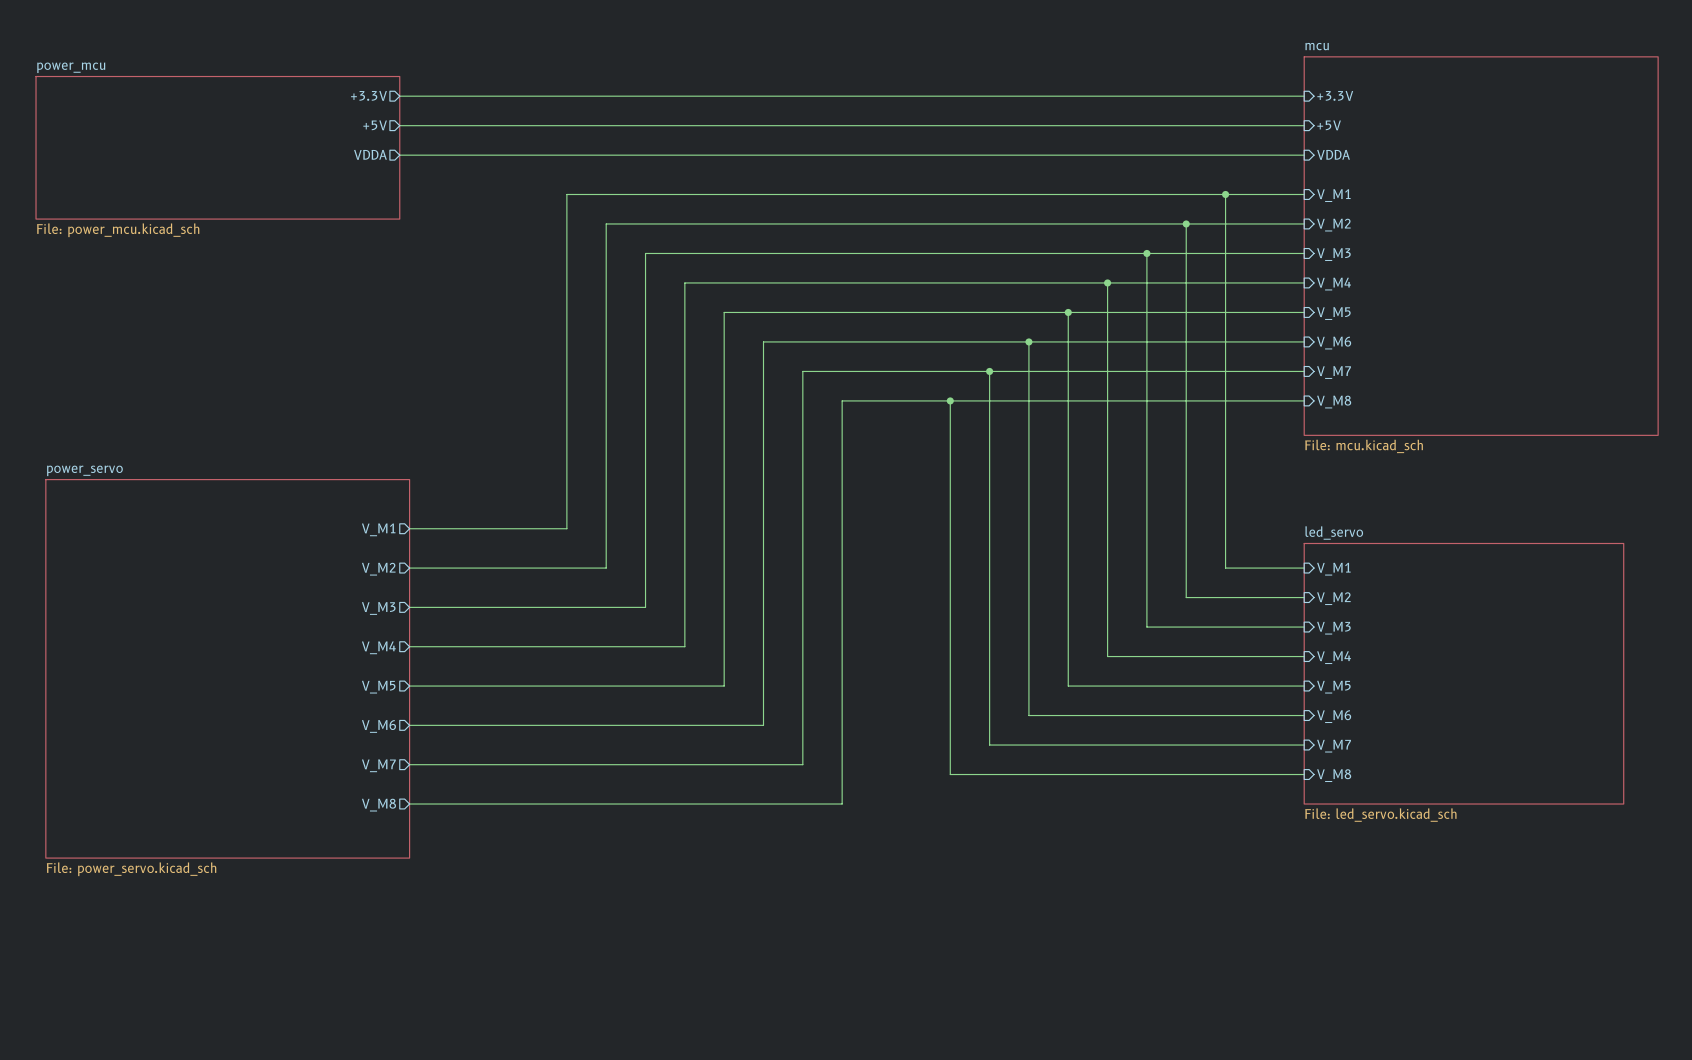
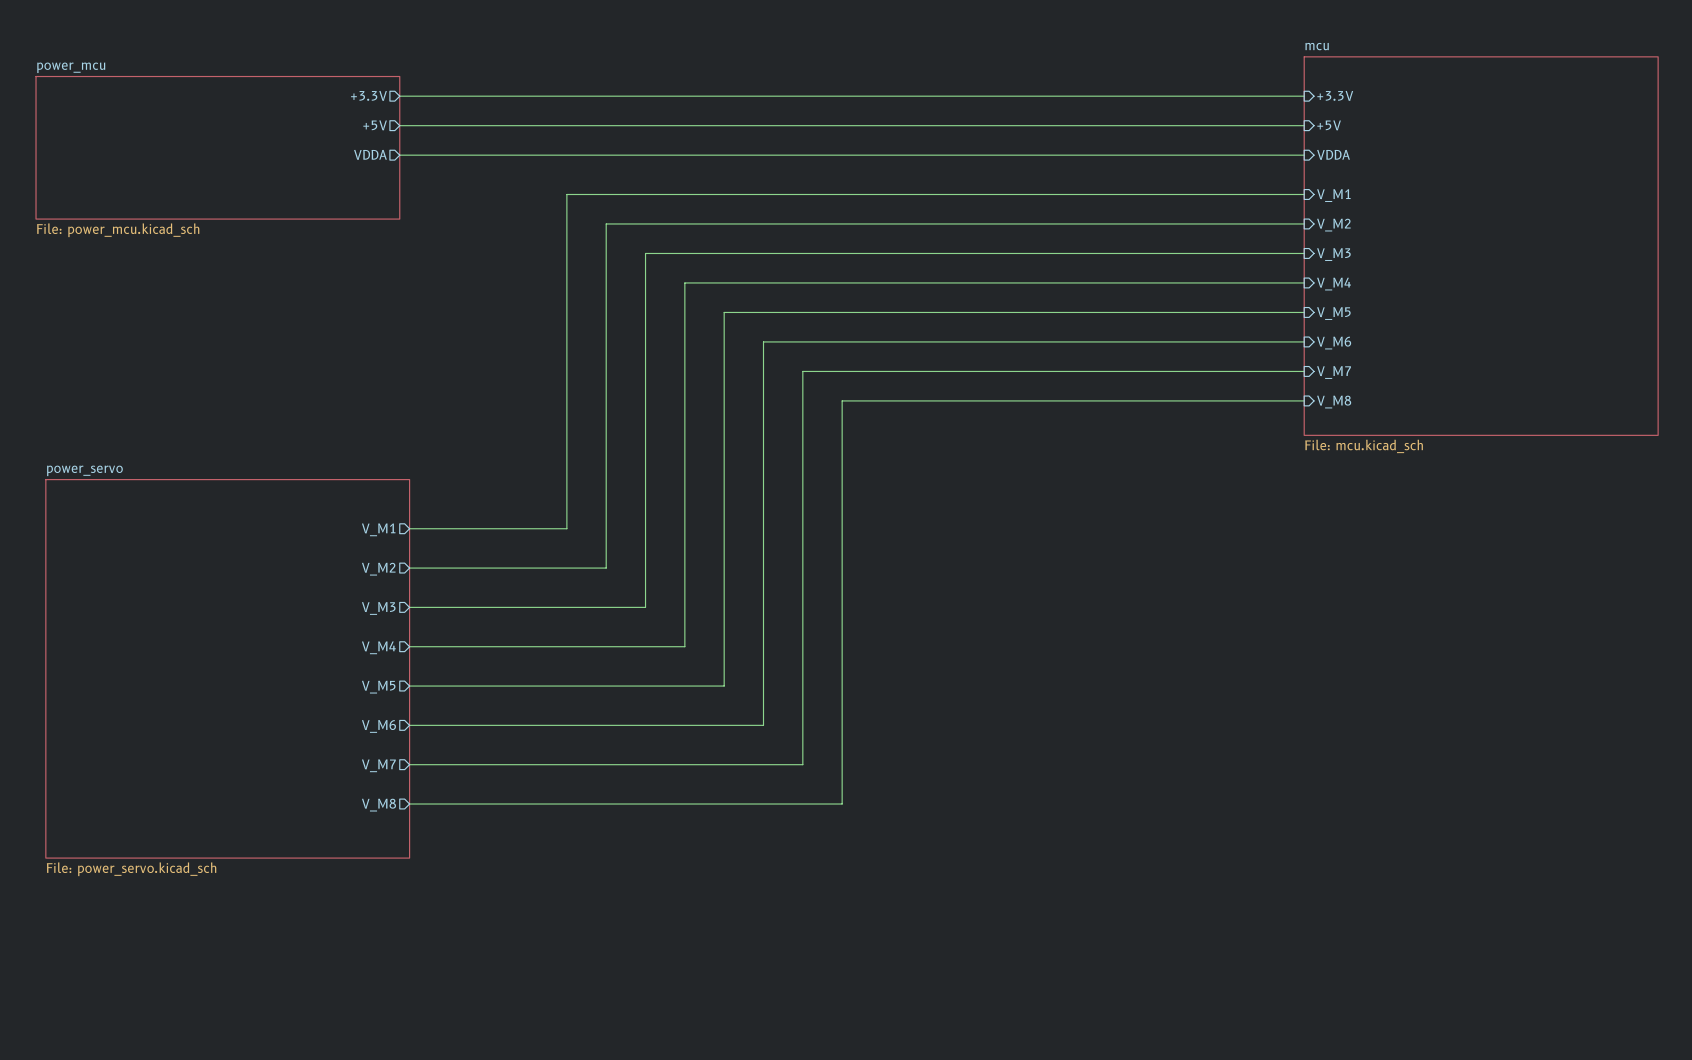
wire: (1225, 194) (1225, 568) (1304, 568) -> none
junction: (1225, 194) -> none
wire: (1186, 223) (1186, 597) (1304, 597) -> none
junction: (1186, 223) -> none
wire: (1146, 253) (1146, 627) (1304, 627) -> none
junction: (1146, 253) -> none
wire: (1107, 282) (1107, 656) (1304, 656) -> none
junction: (1107, 282) -> none
wire: (1068, 312) (1068, 686) (1304, 686) -> none
junction: (1068, 312) -> none
wire: (1028, 341) (1028, 715) (1304, 715) -> none
junction: (1028, 341) -> none
wire: (989, 371) (989, 745) (1304, 745) -> none
junction: (989, 371) -> none
wire: (950, 400) (950, 774) (1304, 774) -> none
junction: (950, 400) -> none
sheet pin: V_M1 (1333, 569) -> none
sheet pin: V_M2 (1333, 598) -> none
sheet pin: V_M3 (1333, 628) -> none
sheet pin: V_M4 (1334, 657) -> none
sheet led_servo: File: led_servo.kicad_sch (1463, 673) -> none
sheet pin: V_M5 (1333, 687) -> none
sheet pin: V_M6 (1334, 716) -> none
sheet pin: V_M7 (1334, 746) -> none
sheet pin: V_M8 (1334, 775) -> none

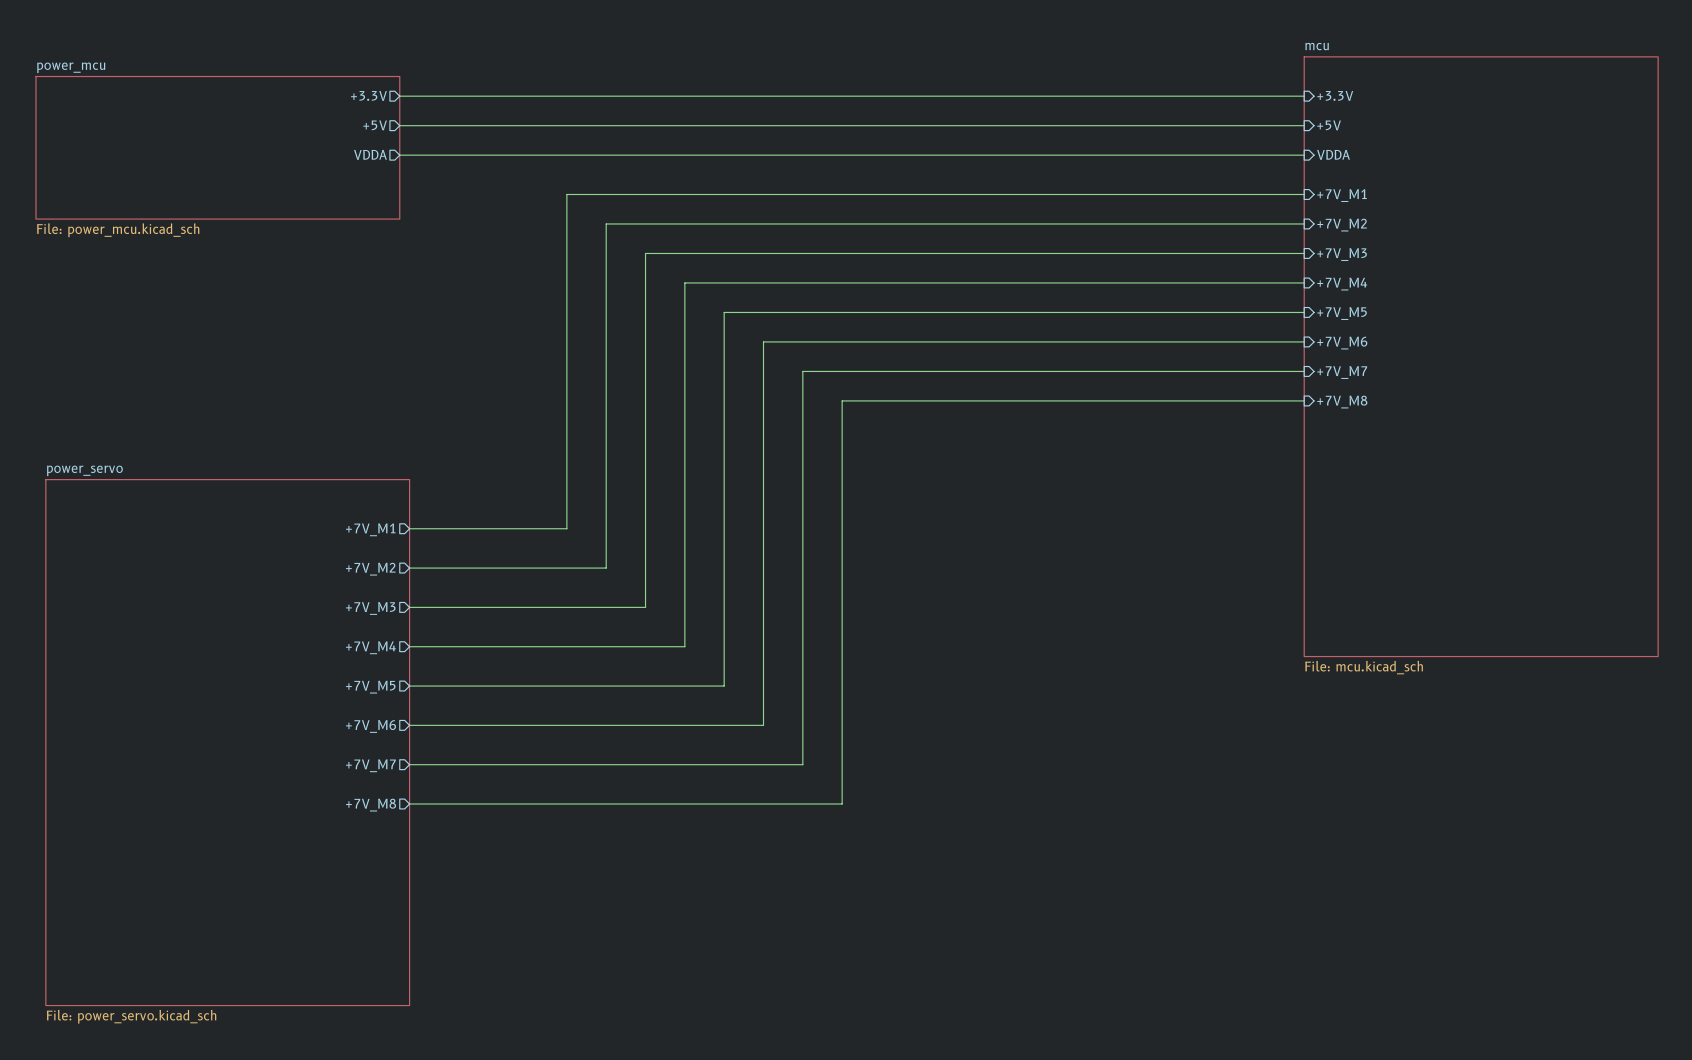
sheet pin: V_M1 (1333, 195) -> +7V_M1 (1342, 195)
sheet pin: V_M2 (1333, 225) -> +7V_M2 (1342, 225)
sheet mcu: File: mcu.kicad_sch (1481, 246) -> none
sheet pin: V_M3 (1333, 254) -> +7V_M3 (1342, 254)
sheet pin: V_M4 (1334, 284) -> +7V_M4 (1342, 284)
sheet pin: V_M5 (1333, 313) -> +7V_M5 (1342, 313)
sheet pin: V_M6 (1334, 343) -> +7V_M6 (1342, 343)
sheet mcu: none -> File: mcu.kicad_sch (1481, 356)
sheet pin: V_M7 (1334, 372) -> +7V_M7 (1342, 372)
sheet pin: V_M8 (1334, 402) -> +7V_M8 (1342, 402)
sheet pin: V_M1 (378, 529) -> +7V_M1 (370, 529)
sheet pin: V_M2 (378, 569) -> +7V_M2 (370, 569)
sheet pin: V_M3 (378, 608) -> +7V_M3 (370, 608)
sheet pin: V_M4 (378, 647) -> +7V_M4 (370, 647)
sheet power_servo: File: power_servo.kicad_sch (227, 668) -> none
sheet pin: V_M5 (378, 687) -> +7V_M5 (370, 687)
sheet pin: V_M6 (378, 726) -> +7V_M6 (370, 726)
sheet power_servo: none -> File: power_servo.kicad_sch (227, 742)
sheet pin: V_M7 (378, 765) -> +7V_M7 (370, 765)
sheet pin: V_M8 (378, 805) -> +7V_M8 (371, 805)

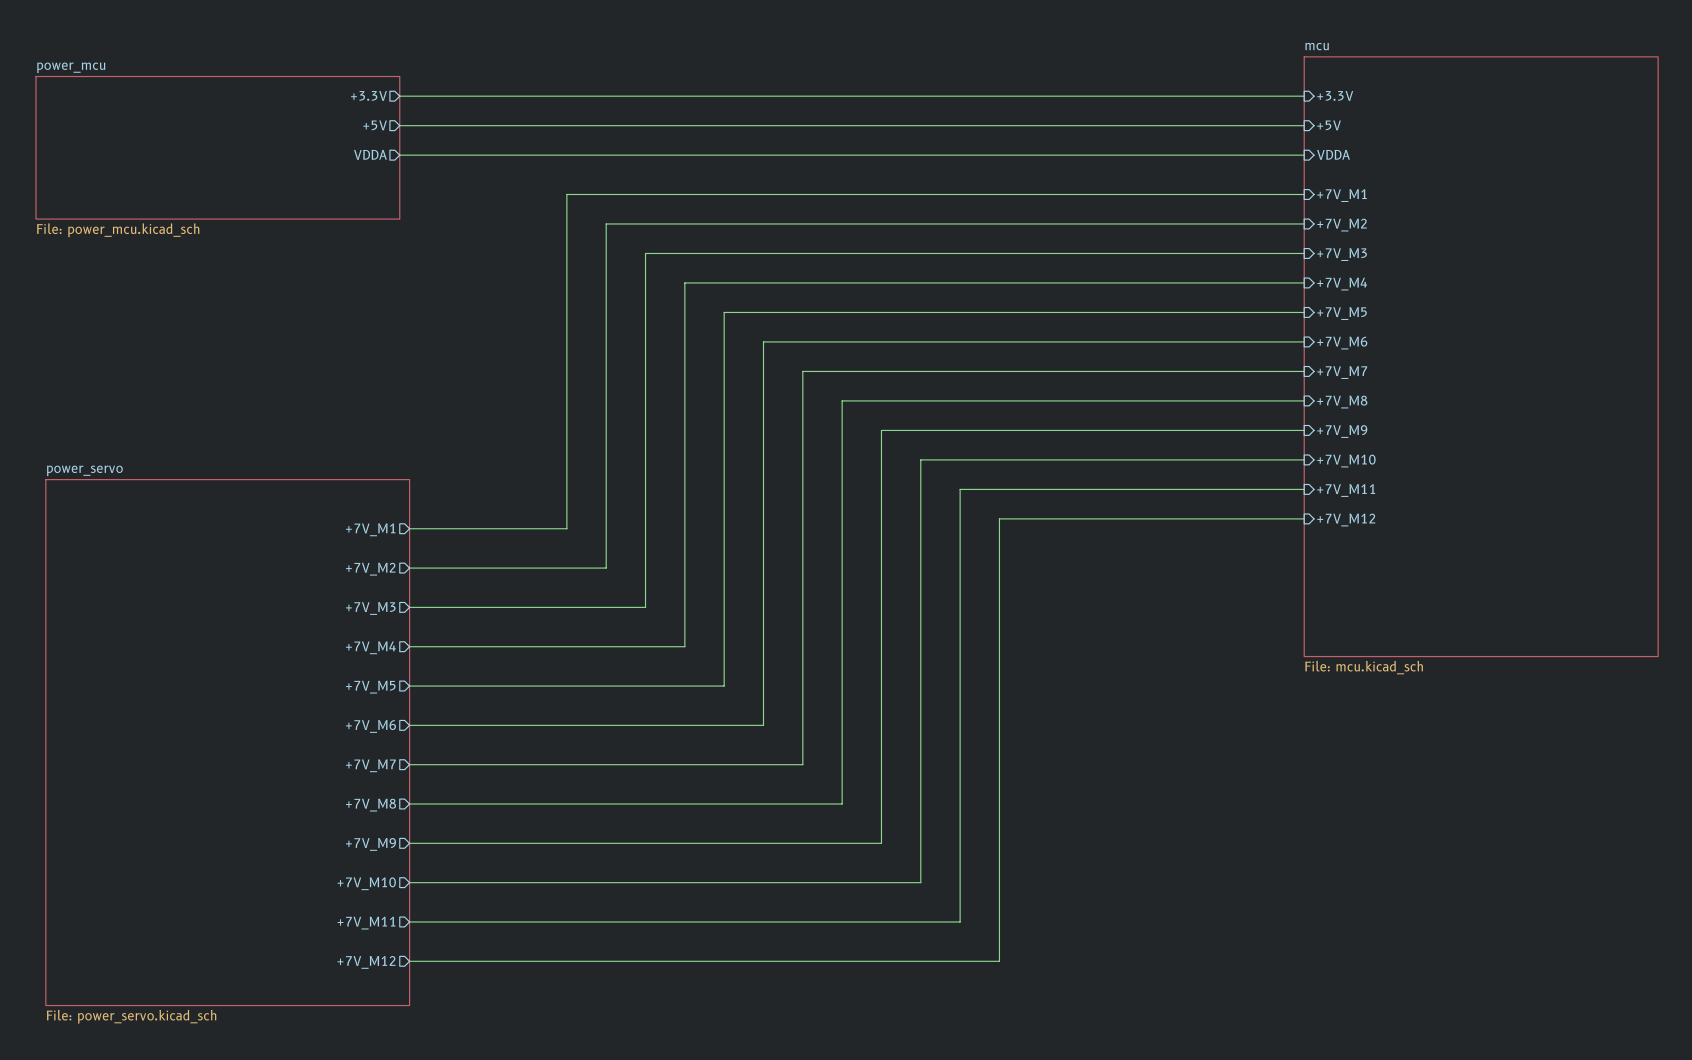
wire: none -> (1304, 430) (881, 430) (881, 843) (409, 843)
sheet pin: none -> +7V_M9 (1342, 431)
wire: none -> (1304, 459) (920, 459) (920, 882) (409, 882)
sheet pin: none -> +7V_M10 (1346, 461)
wire: none -> (1304, 489) (960, 489) (960, 921) (409, 921)
sheet pin: none -> +7V_M11 (1346, 490)
wire: none -> (1304, 518) (999, 518) (999, 961) (409, 961)
sheet pin: none -> +7V_M12 (1346, 520)
sheet pin: none -> +7V_M9 (370, 844)
sheet pin: none -> +7V_M10 (366, 883)
sheet pin: none -> +7V_M11 (366, 923)
sheet pin: none -> +7V_M12 (366, 962)

